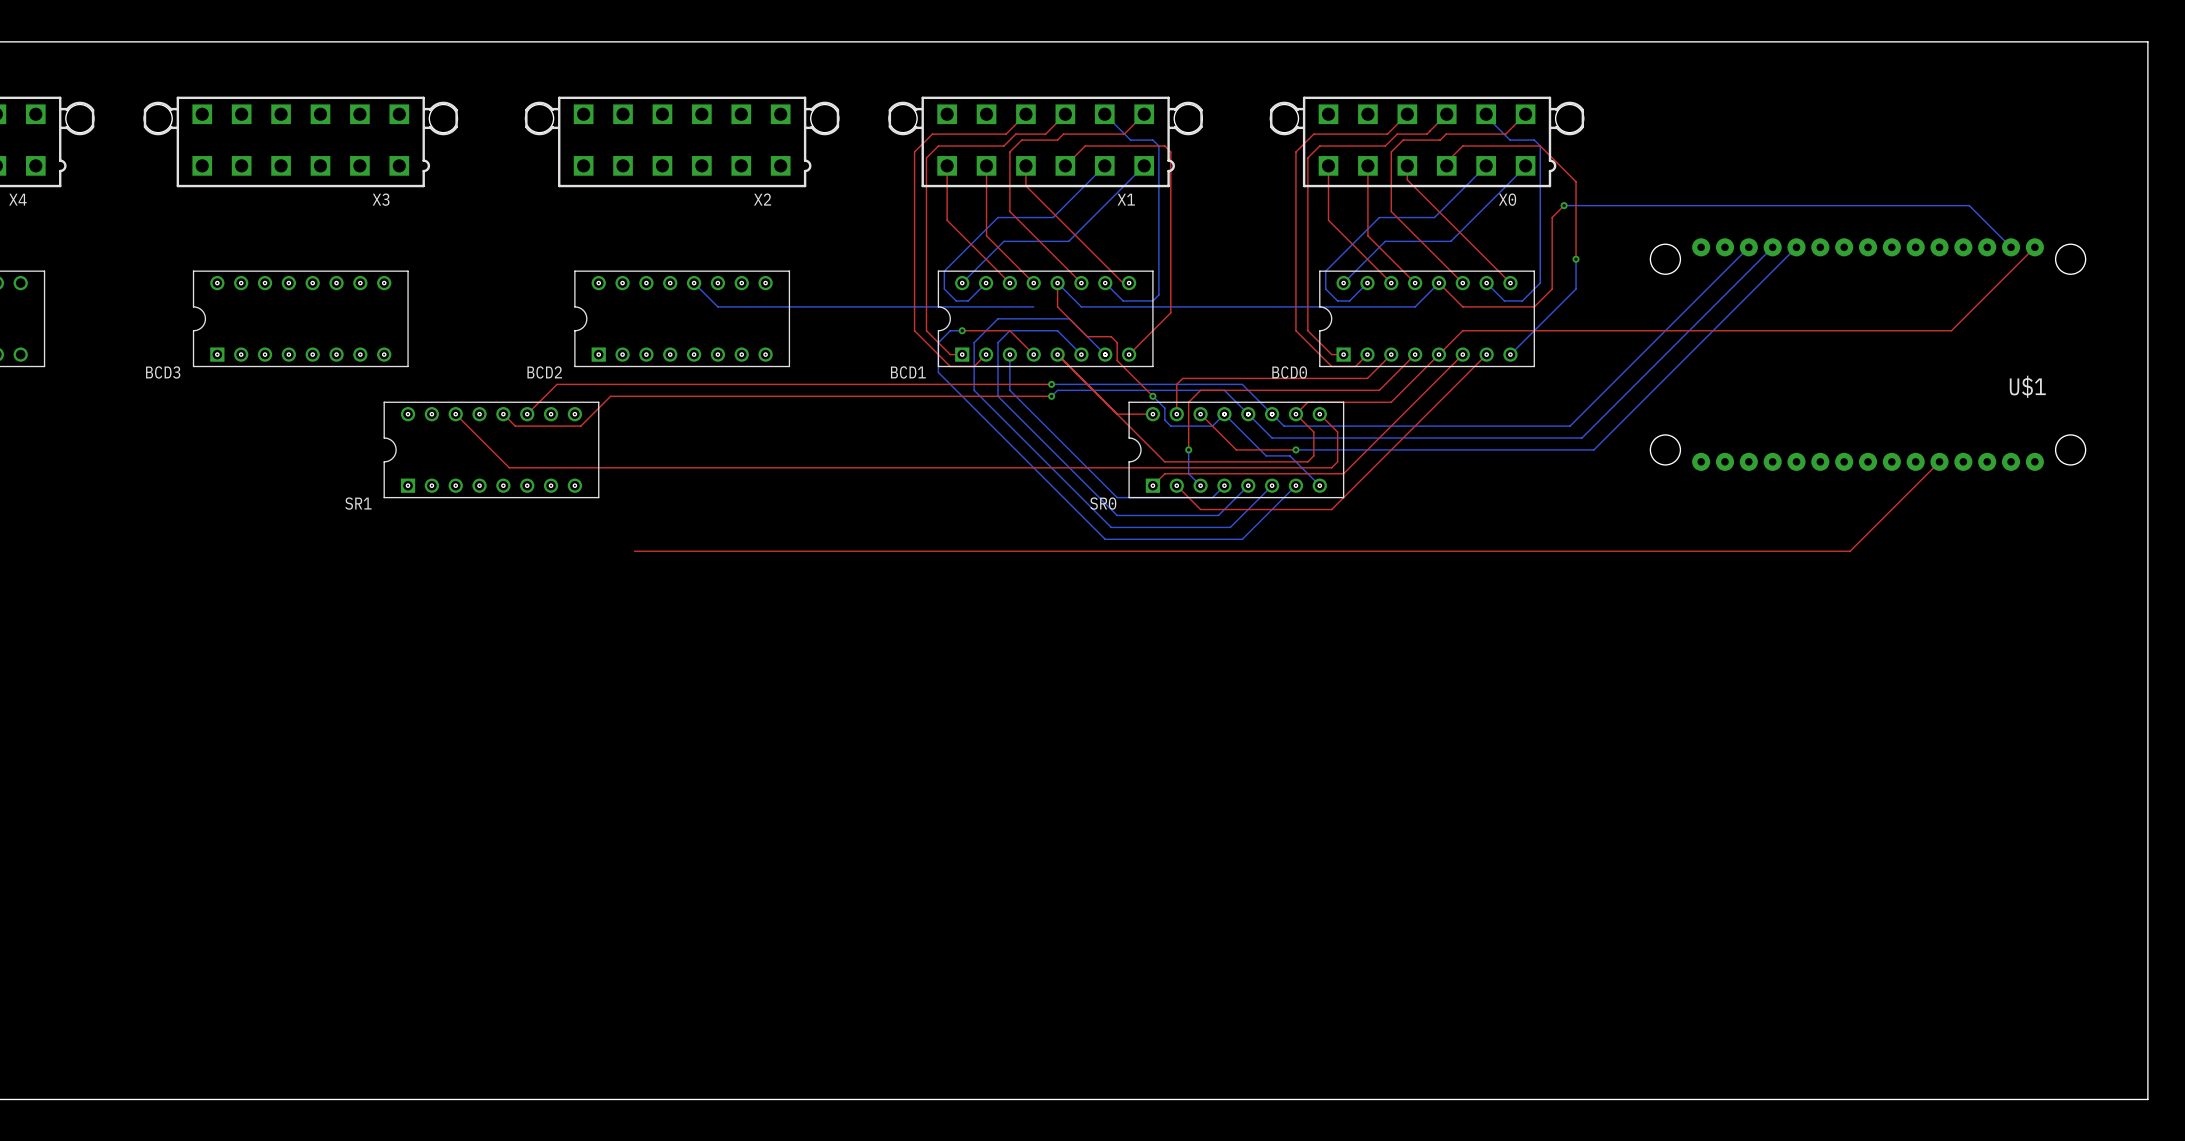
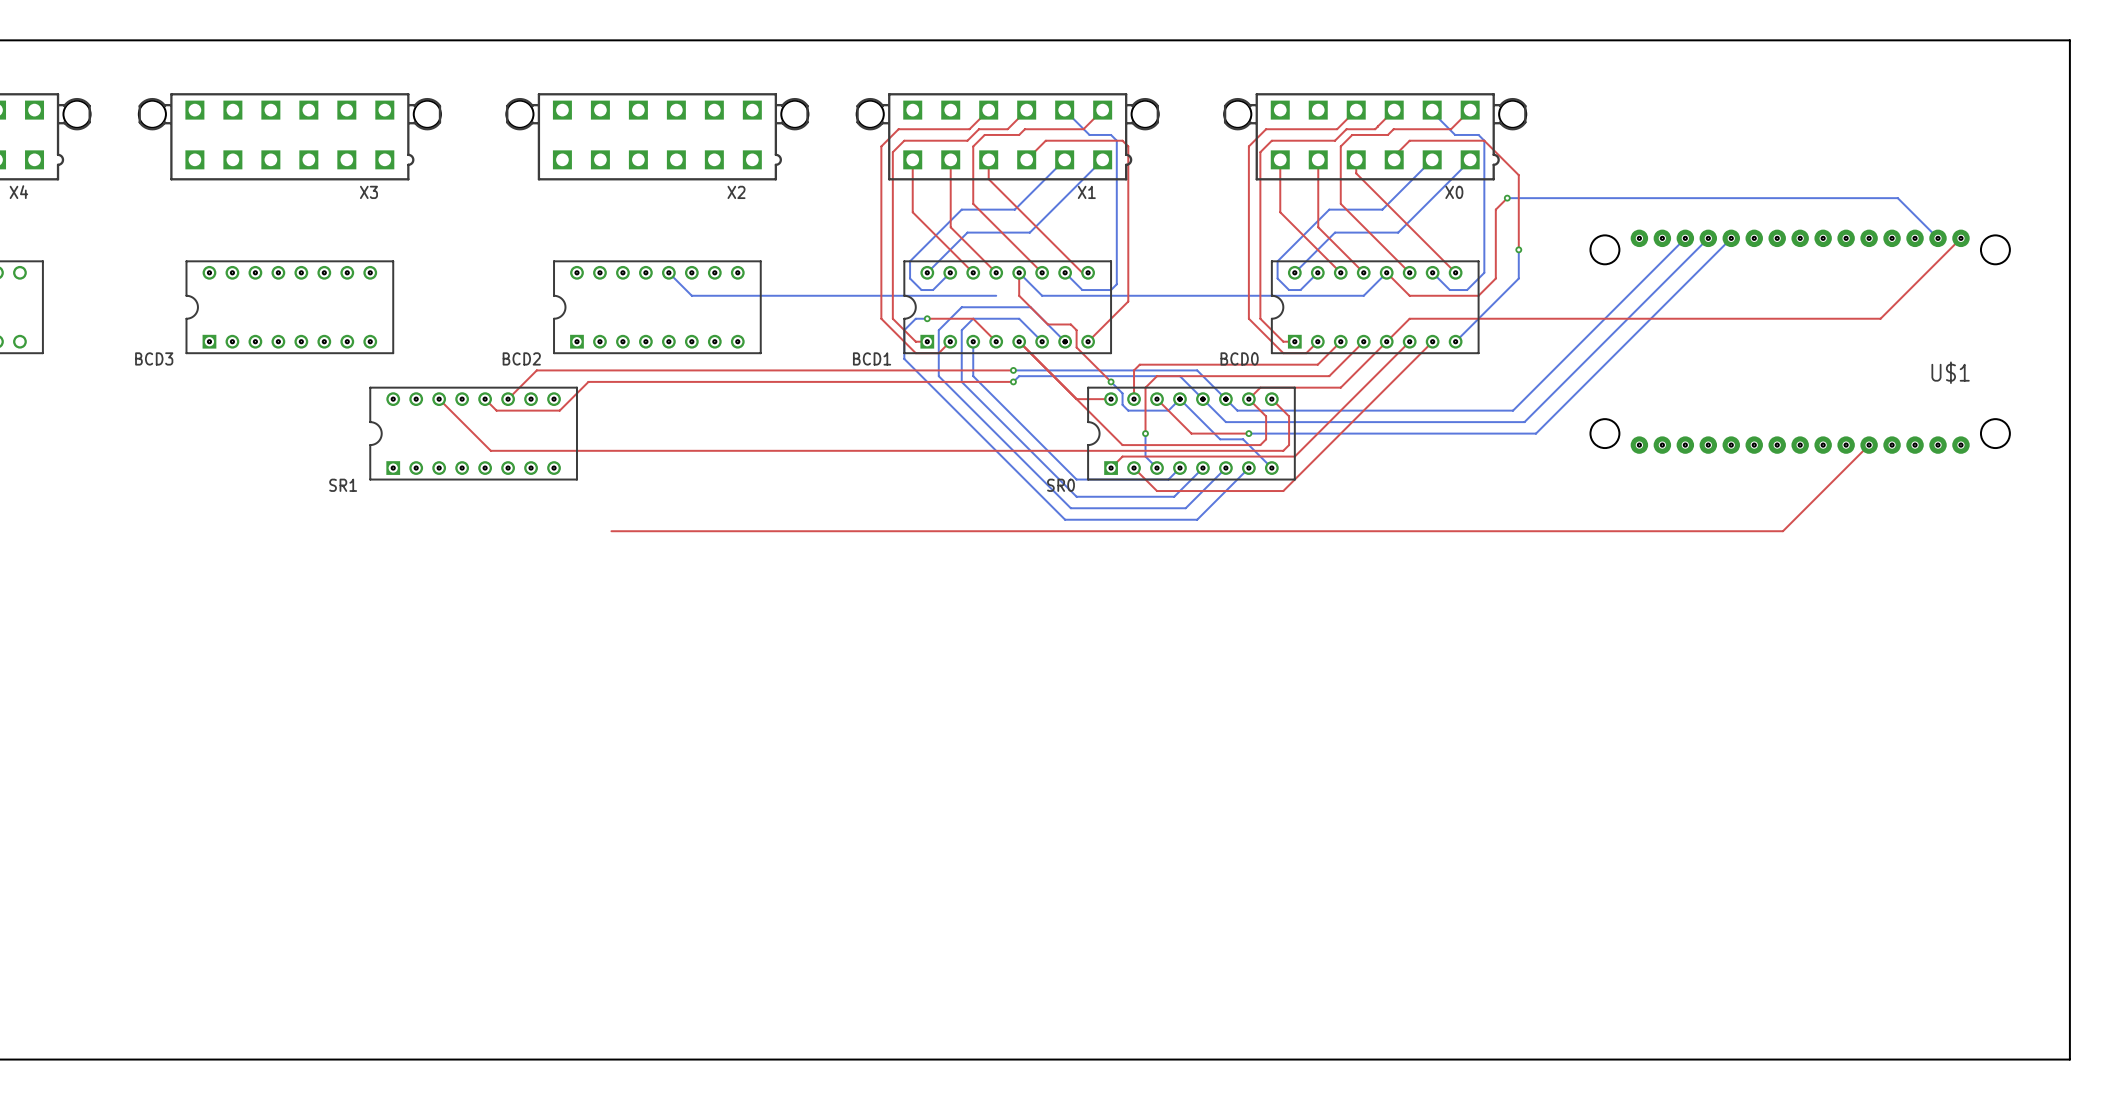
U$1 footprint: [1650, 238, 2086, 471] -> [1590, 229, 2010, 454]

